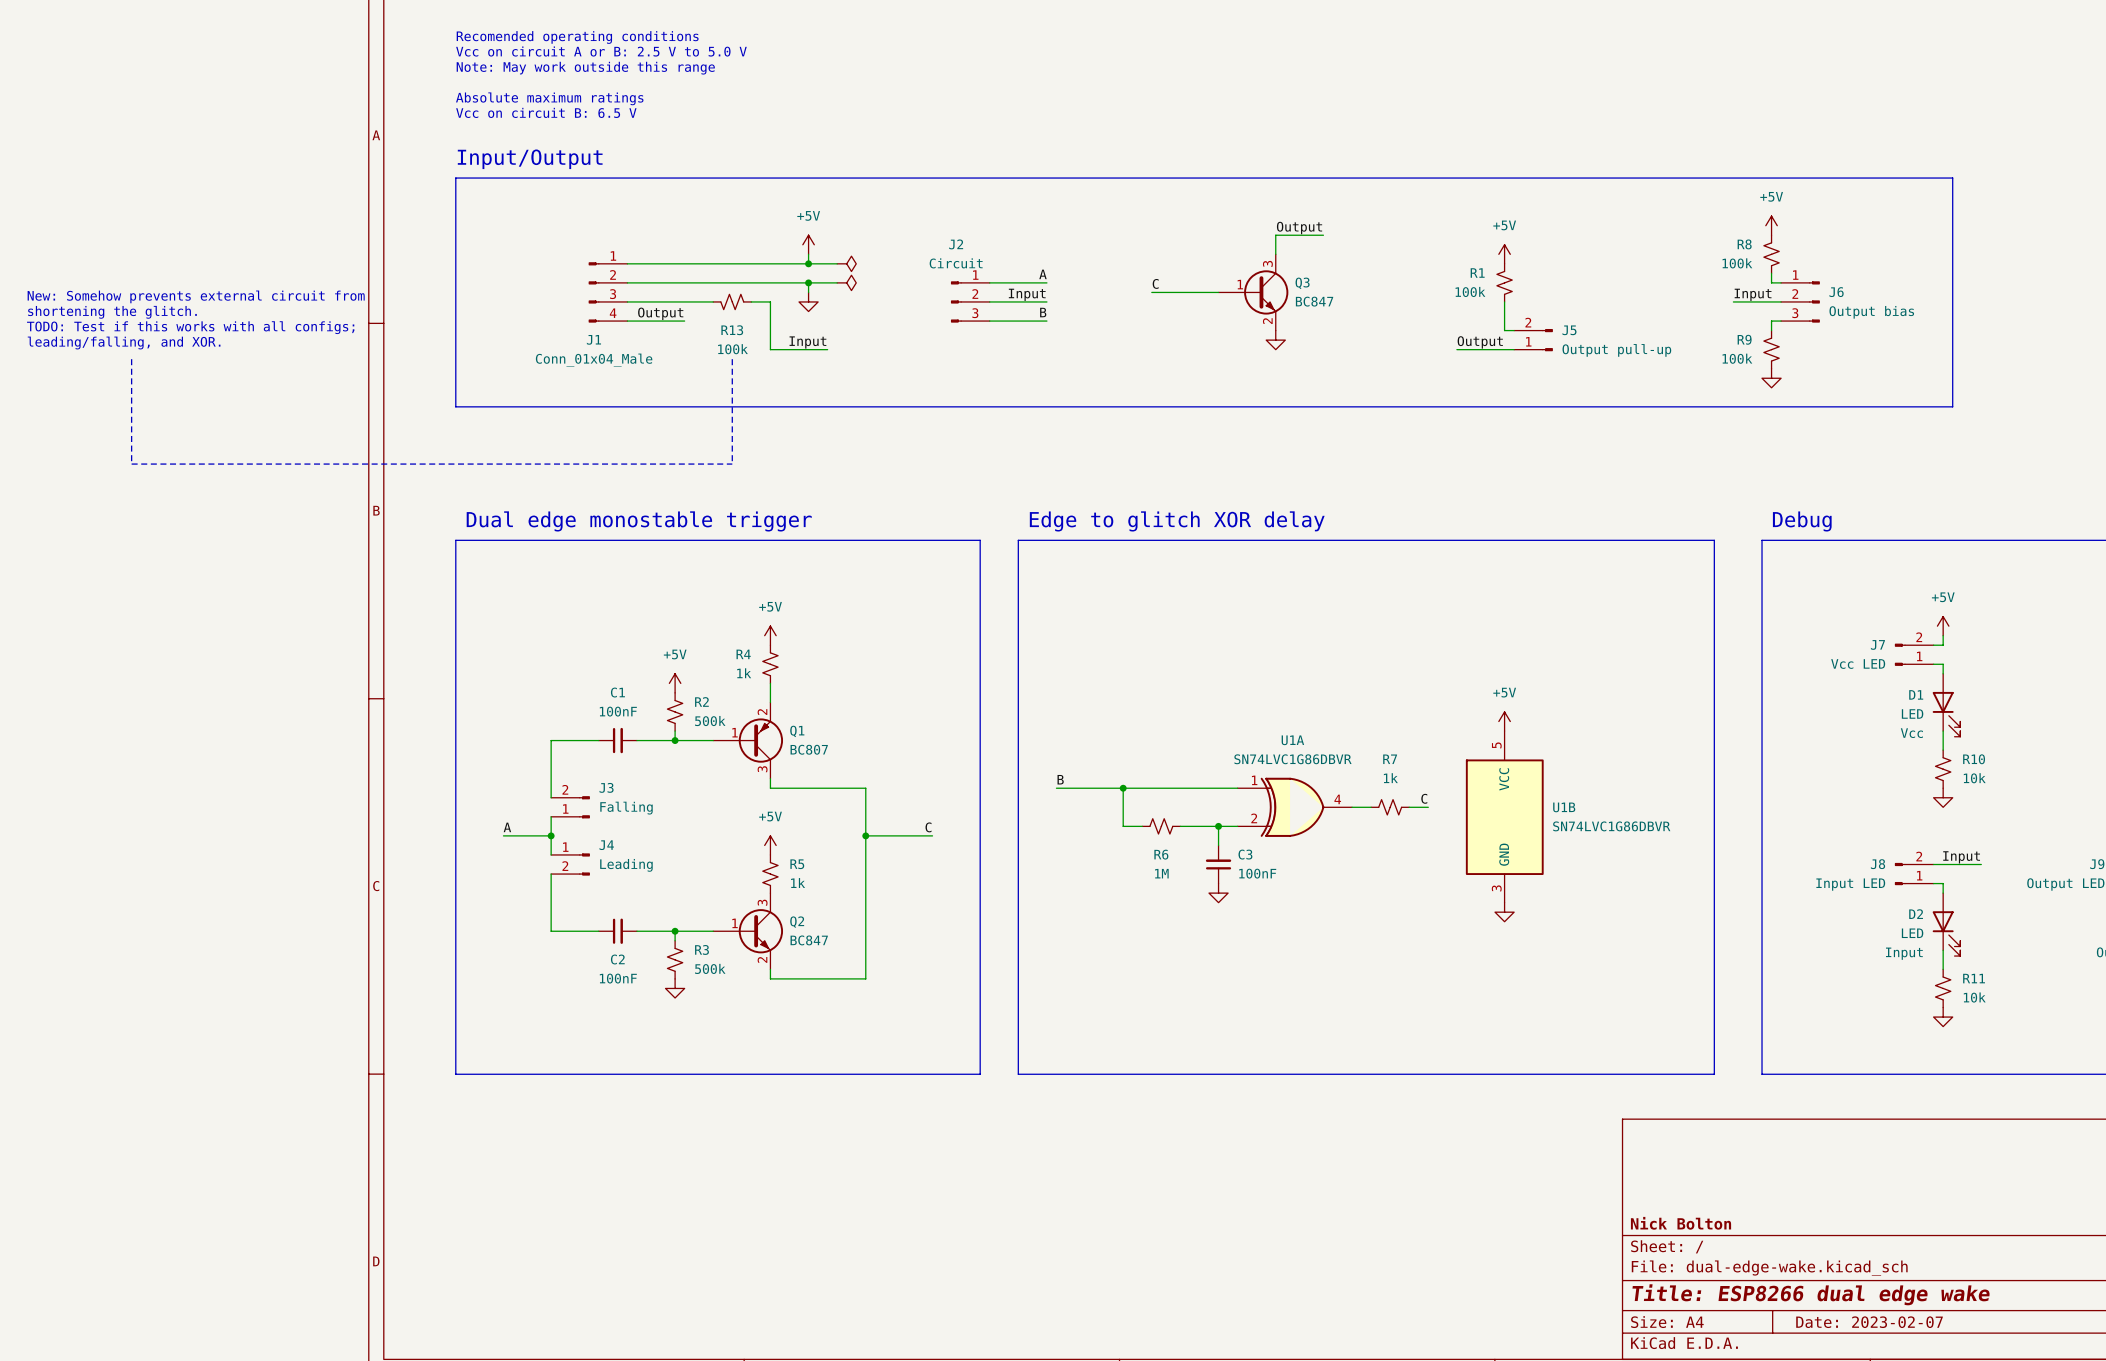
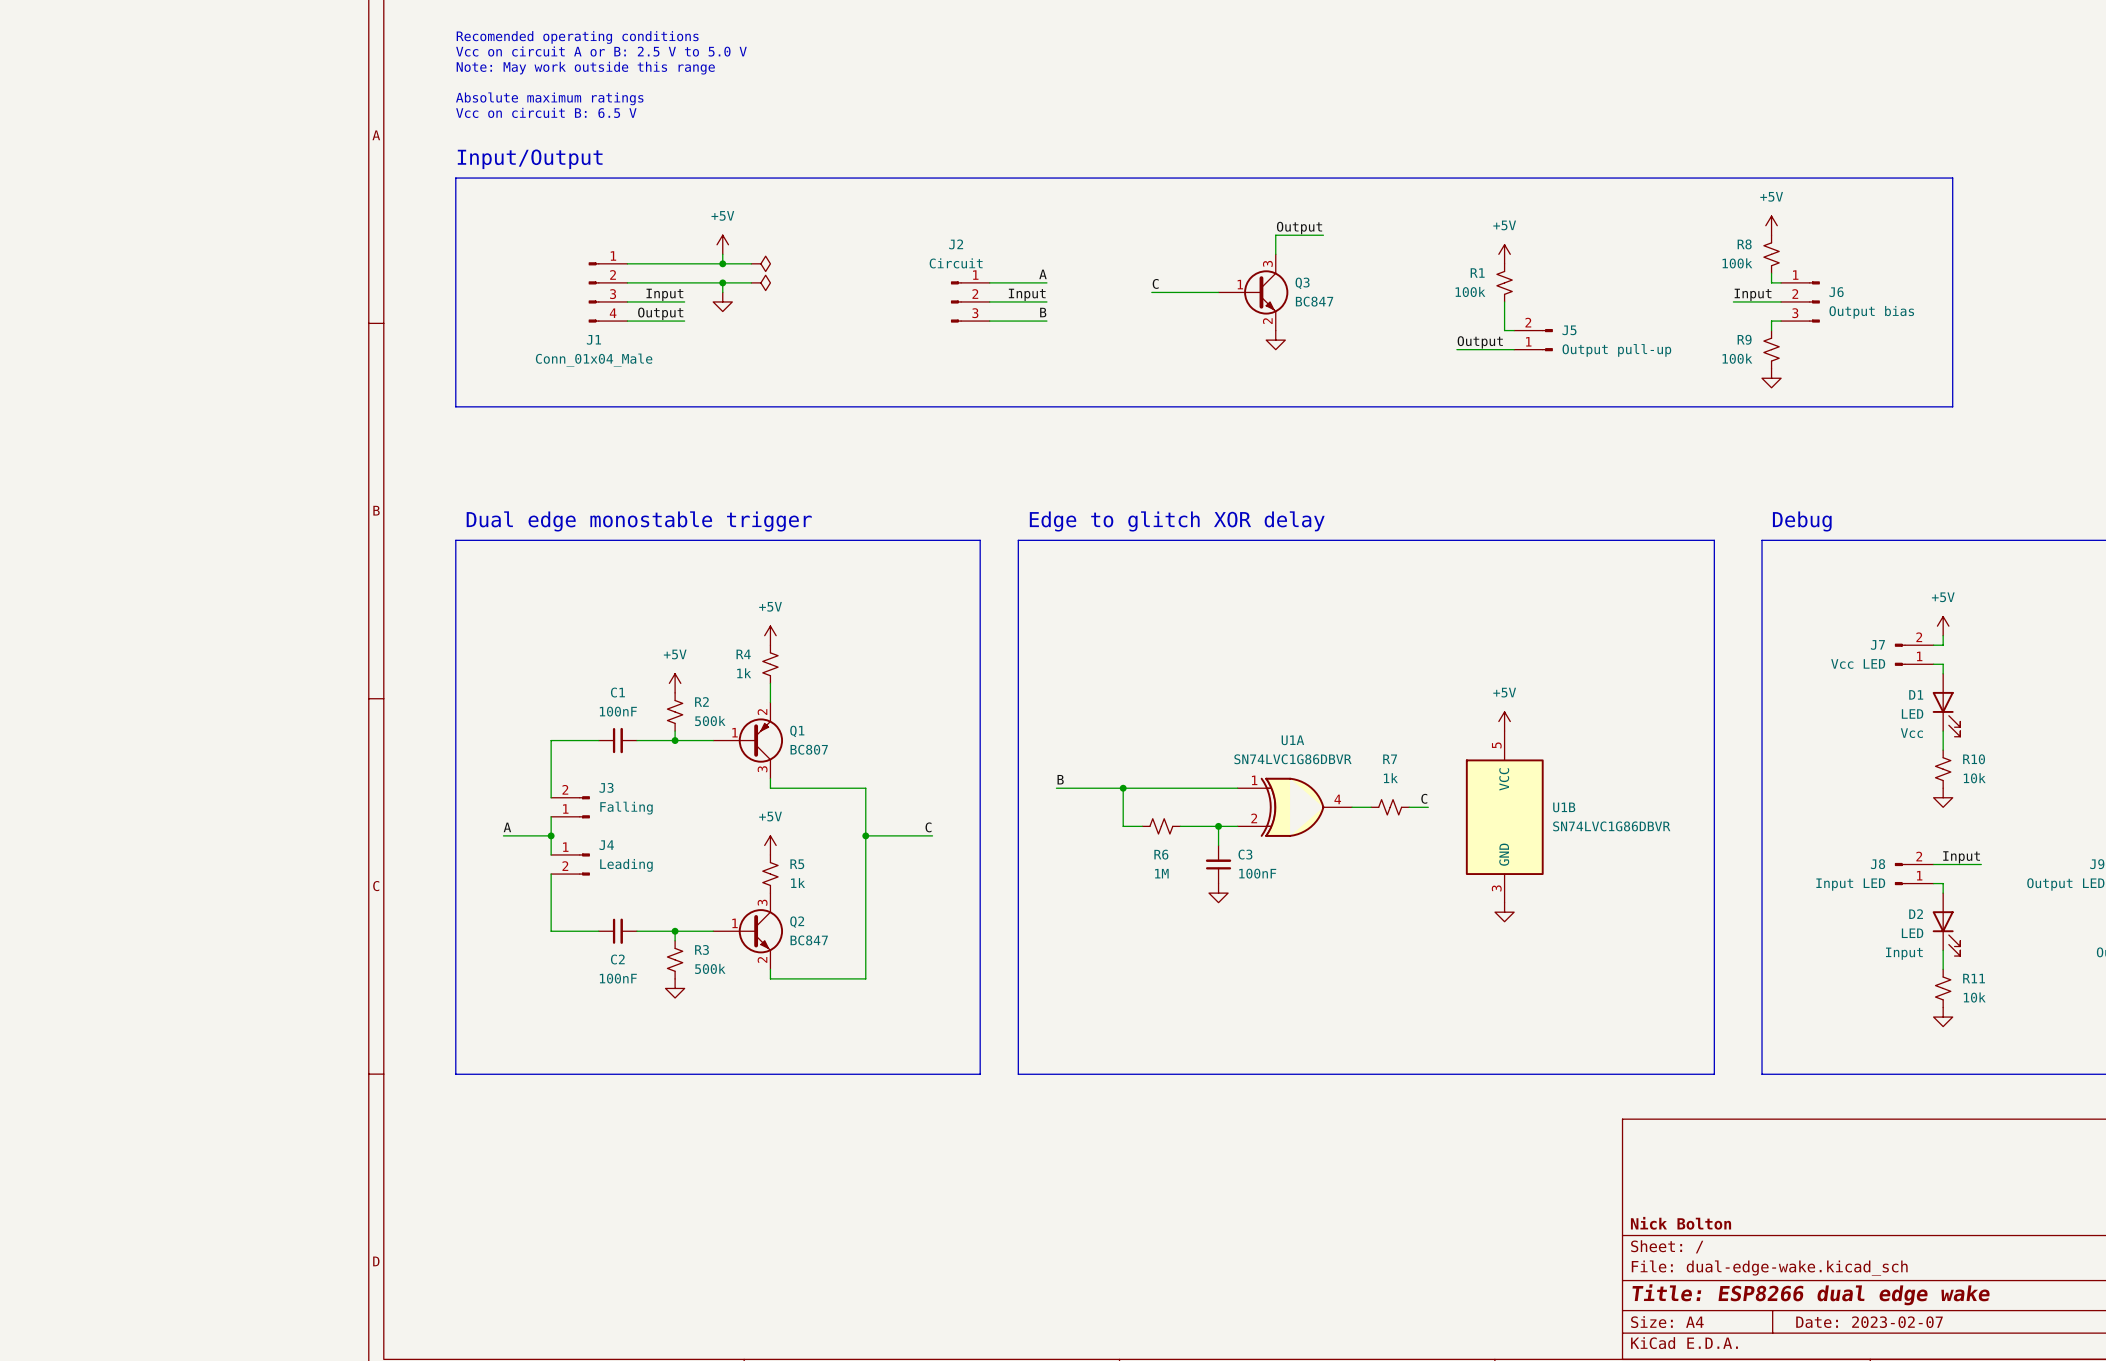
power symbol position: +5V (808, 244) -> +5V (722, 244)
wire: (808, 254) (808, 263) -> (722, 254) (722, 263)
junction: none -> (722, 263)
wire: (751, 263) (837, 263) -> none
power symbol: none -> (760, 263)
junction: (808, 263) -> none
power symbol: (846, 263) -> none
junction: none -> (722, 282)
wire: (751, 282) (837, 282) -> none
power symbol: none -> (760, 282)
wire: (808, 282) (808, 292) -> (722, 282) (722, 292)
junction: (808, 282) -> none
power symbol: (846, 282) -> none
text: New: Somehow prevents external circuit from (196, 296) -> none
wire: (684, 301) (713, 301) -> none
R13: 100k (732, 301) -> none
wire: (751, 301) (770, 301) (770, 349) (827, 349) -> none
power symbol position: (808, 301) -> (722, 301)
text: shortening the glitch. (112, 312) -> none
text: TODO: Test if this works with all configs; (190, 327) -> none
label position: Input (807, 342) -> Input (664, 294)
text: leading/falling, and XOR. (124, 343) -> none
line: (131, 359) (131, 464) (732, 464) (732, 359) -> none

